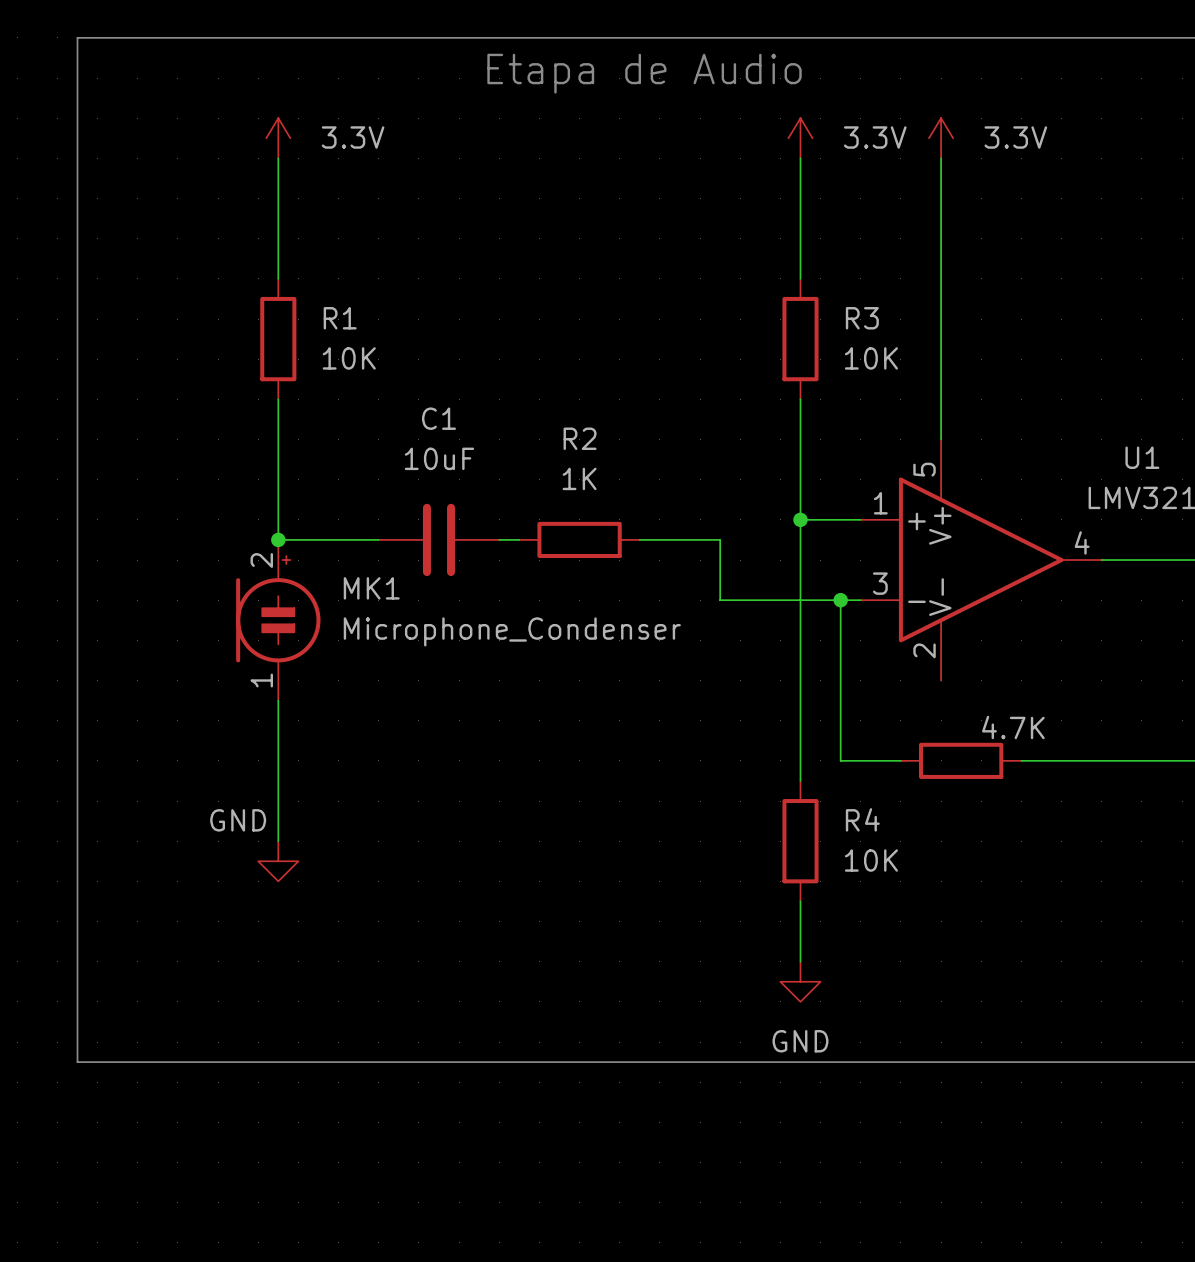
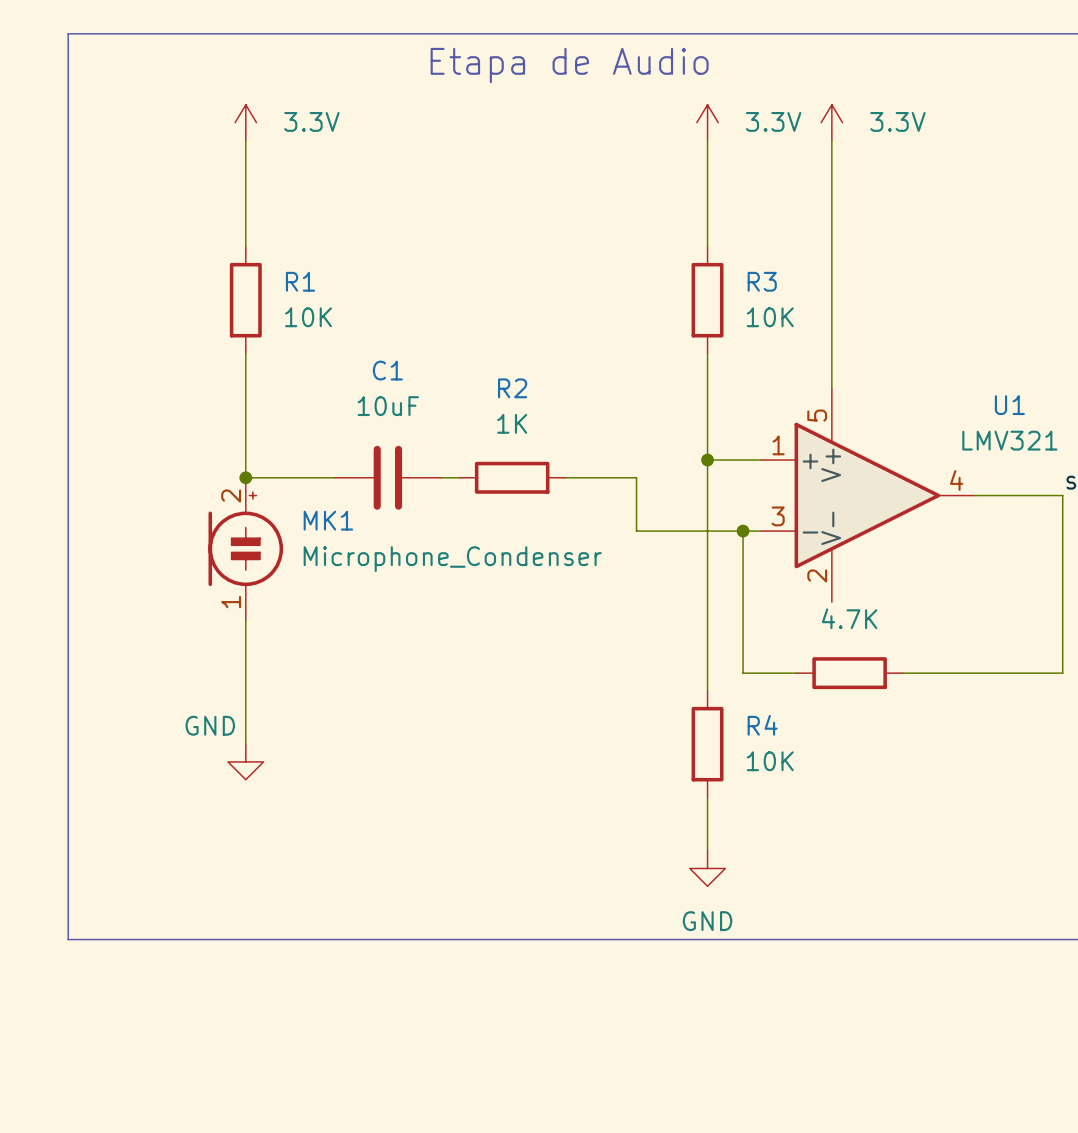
part value position: 4.7K (1013, 727) -> 4.7K (849, 618)

